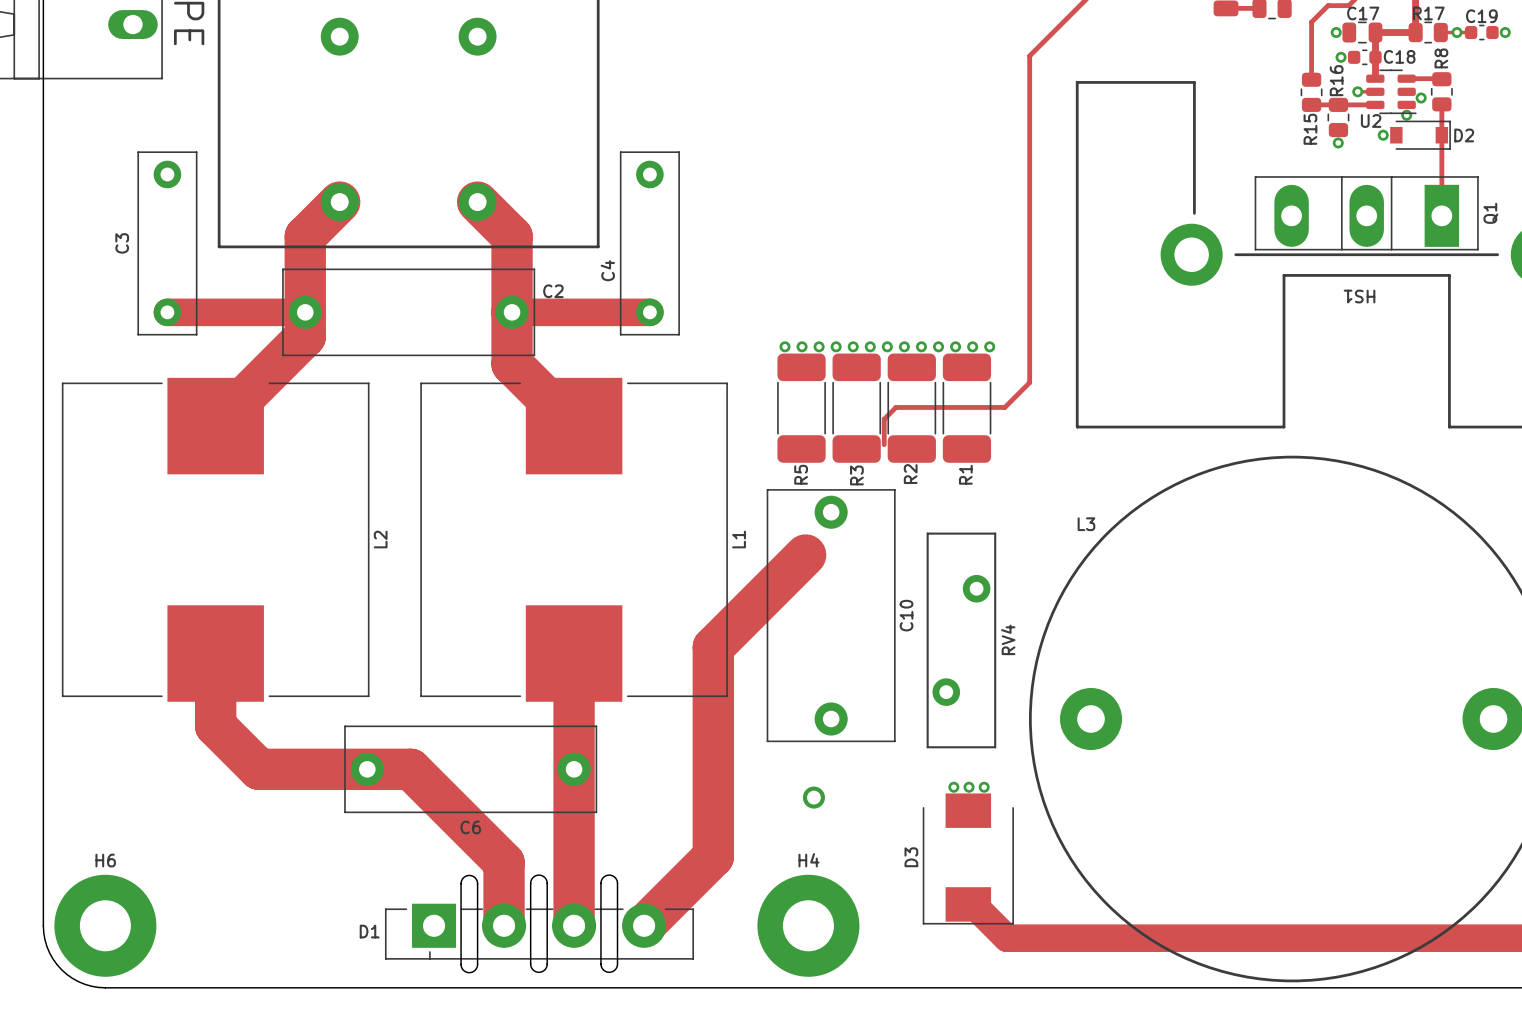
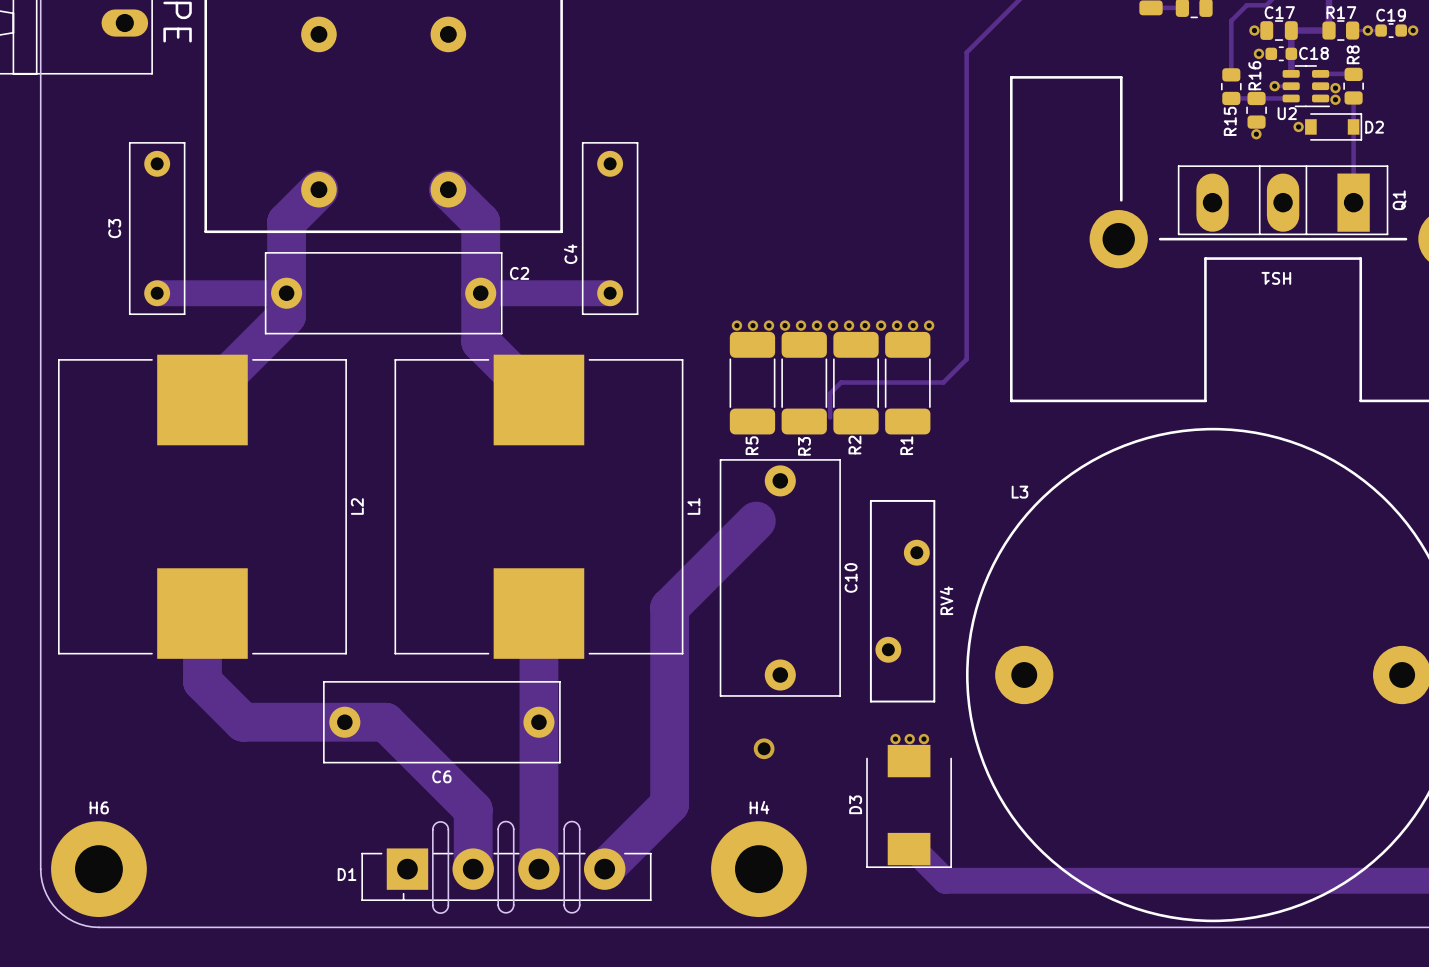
via: none -> (1335, 88)
via: (1421, 98) -> none
via: none -> (1335, 99)
via: (1406, 115) -> none

